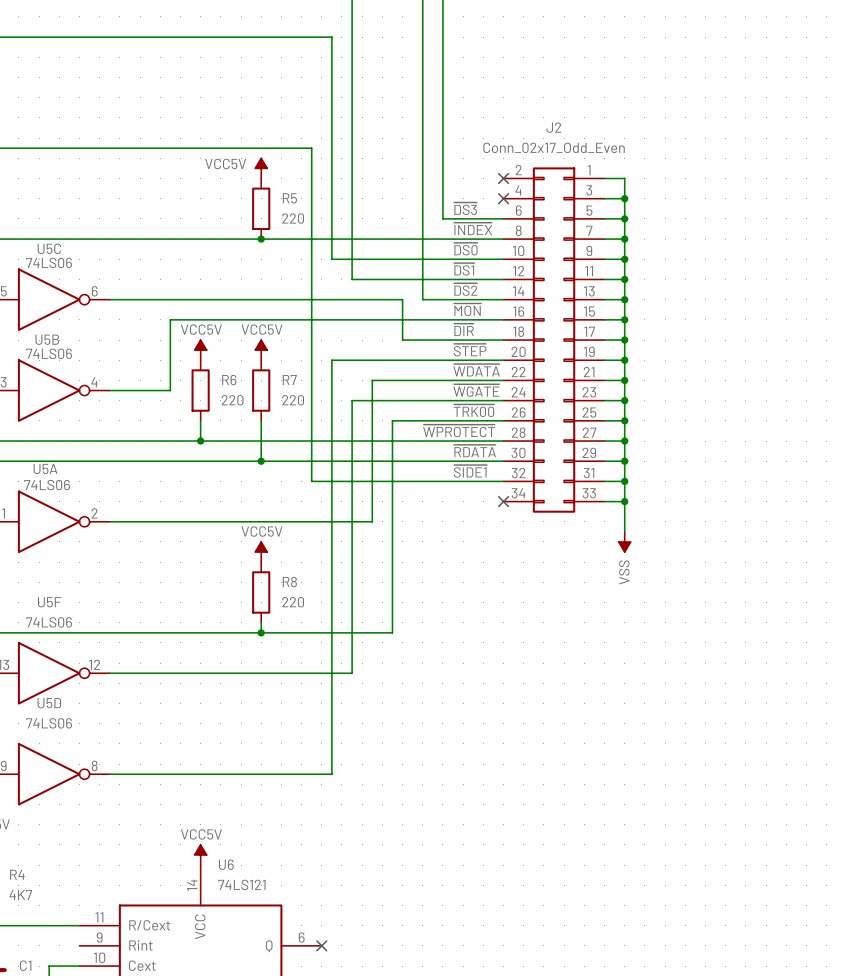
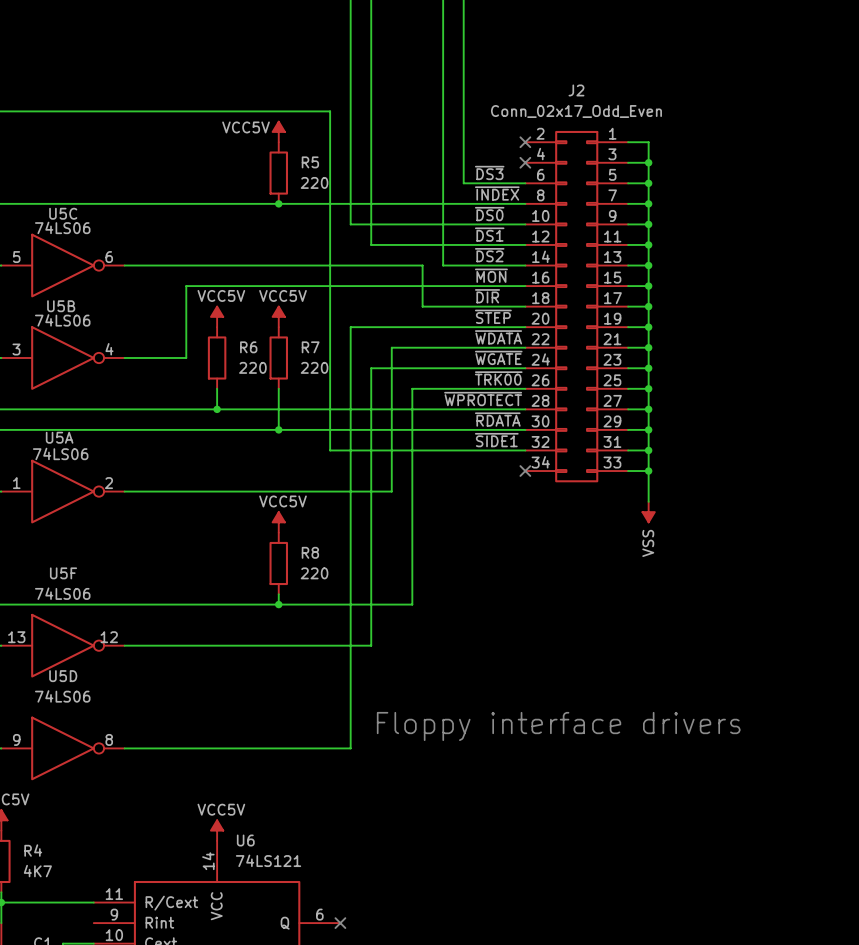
text: none -> Floppy interface drivers (558, 726)

